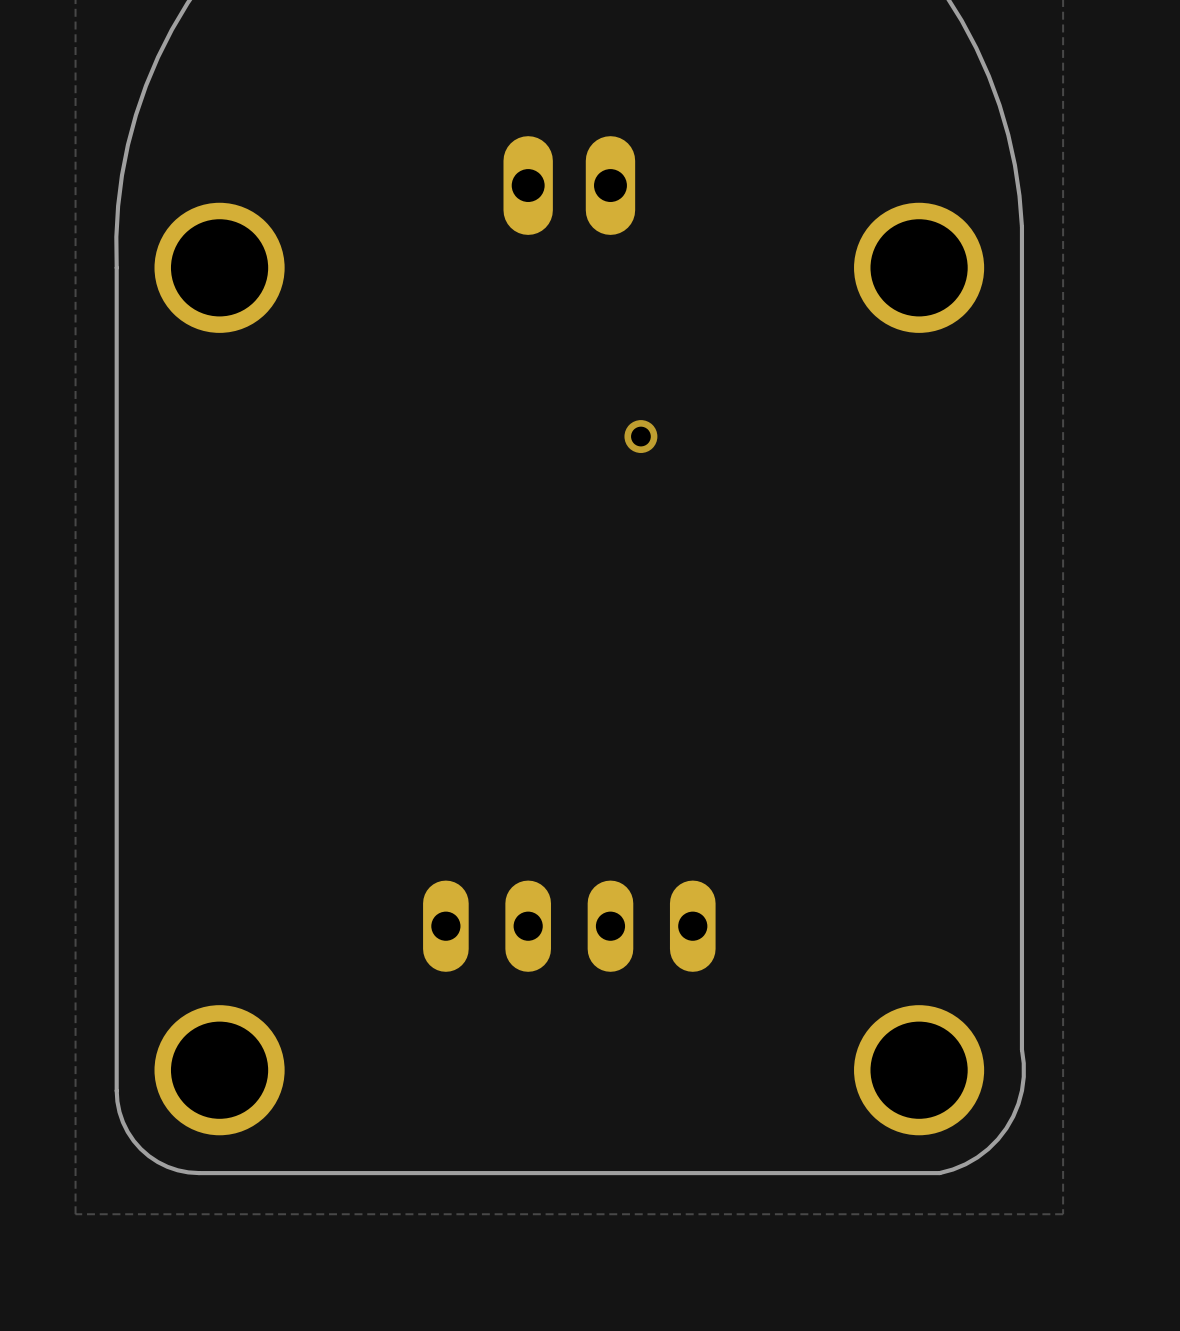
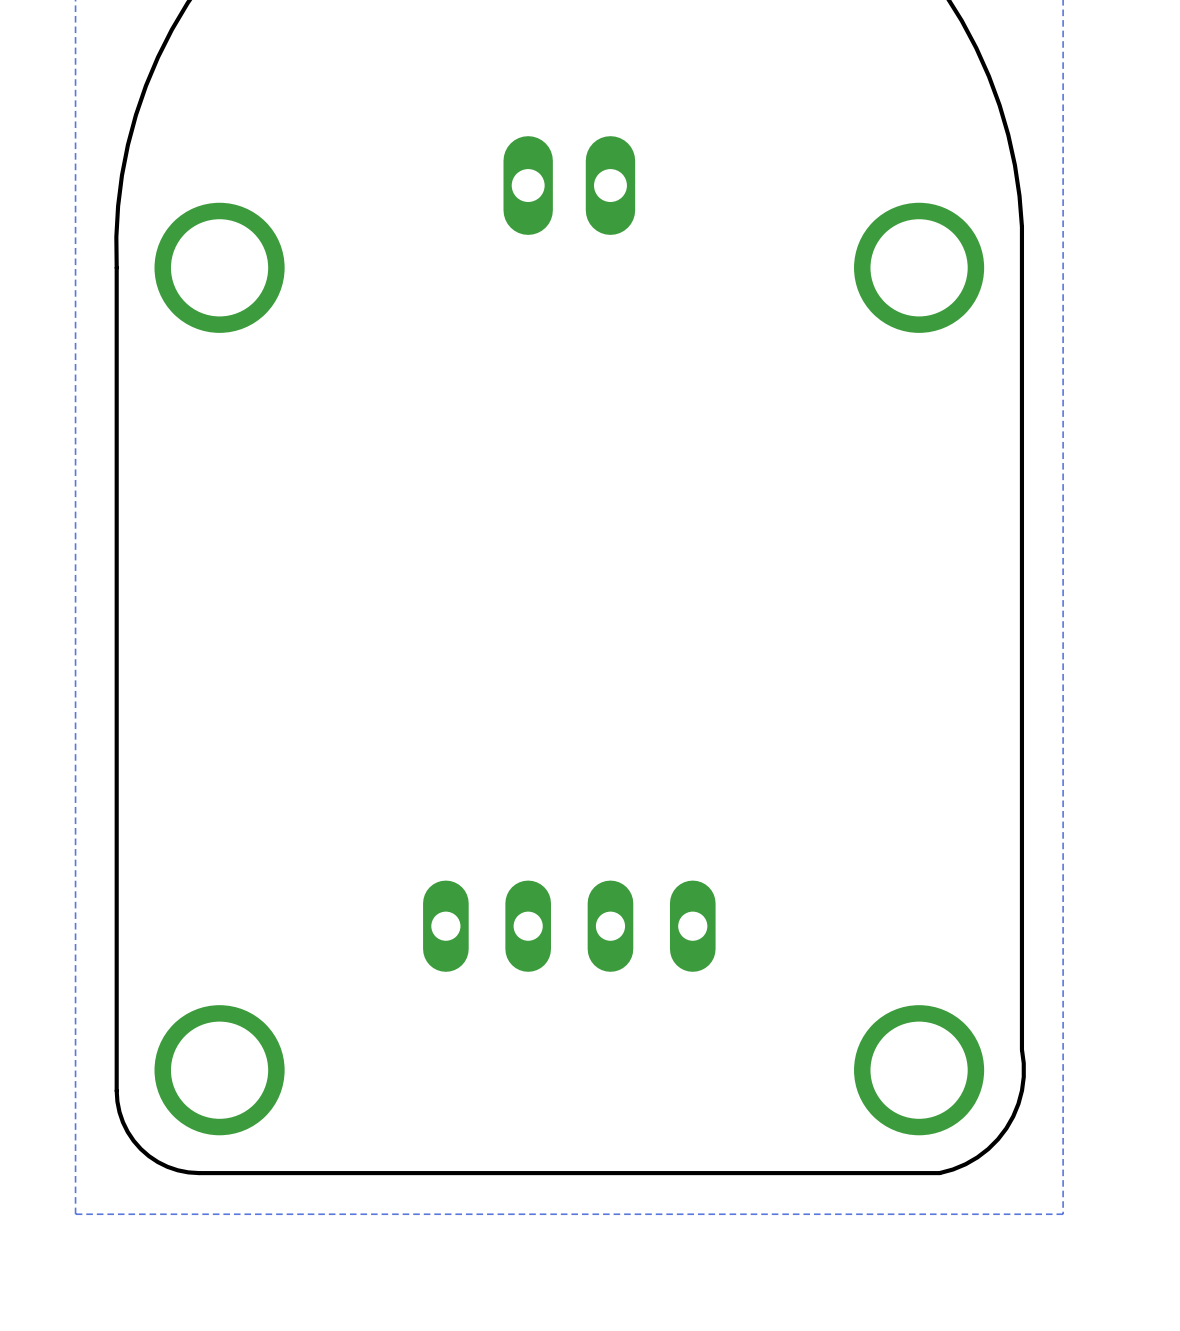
via: (640, 436) -> none

